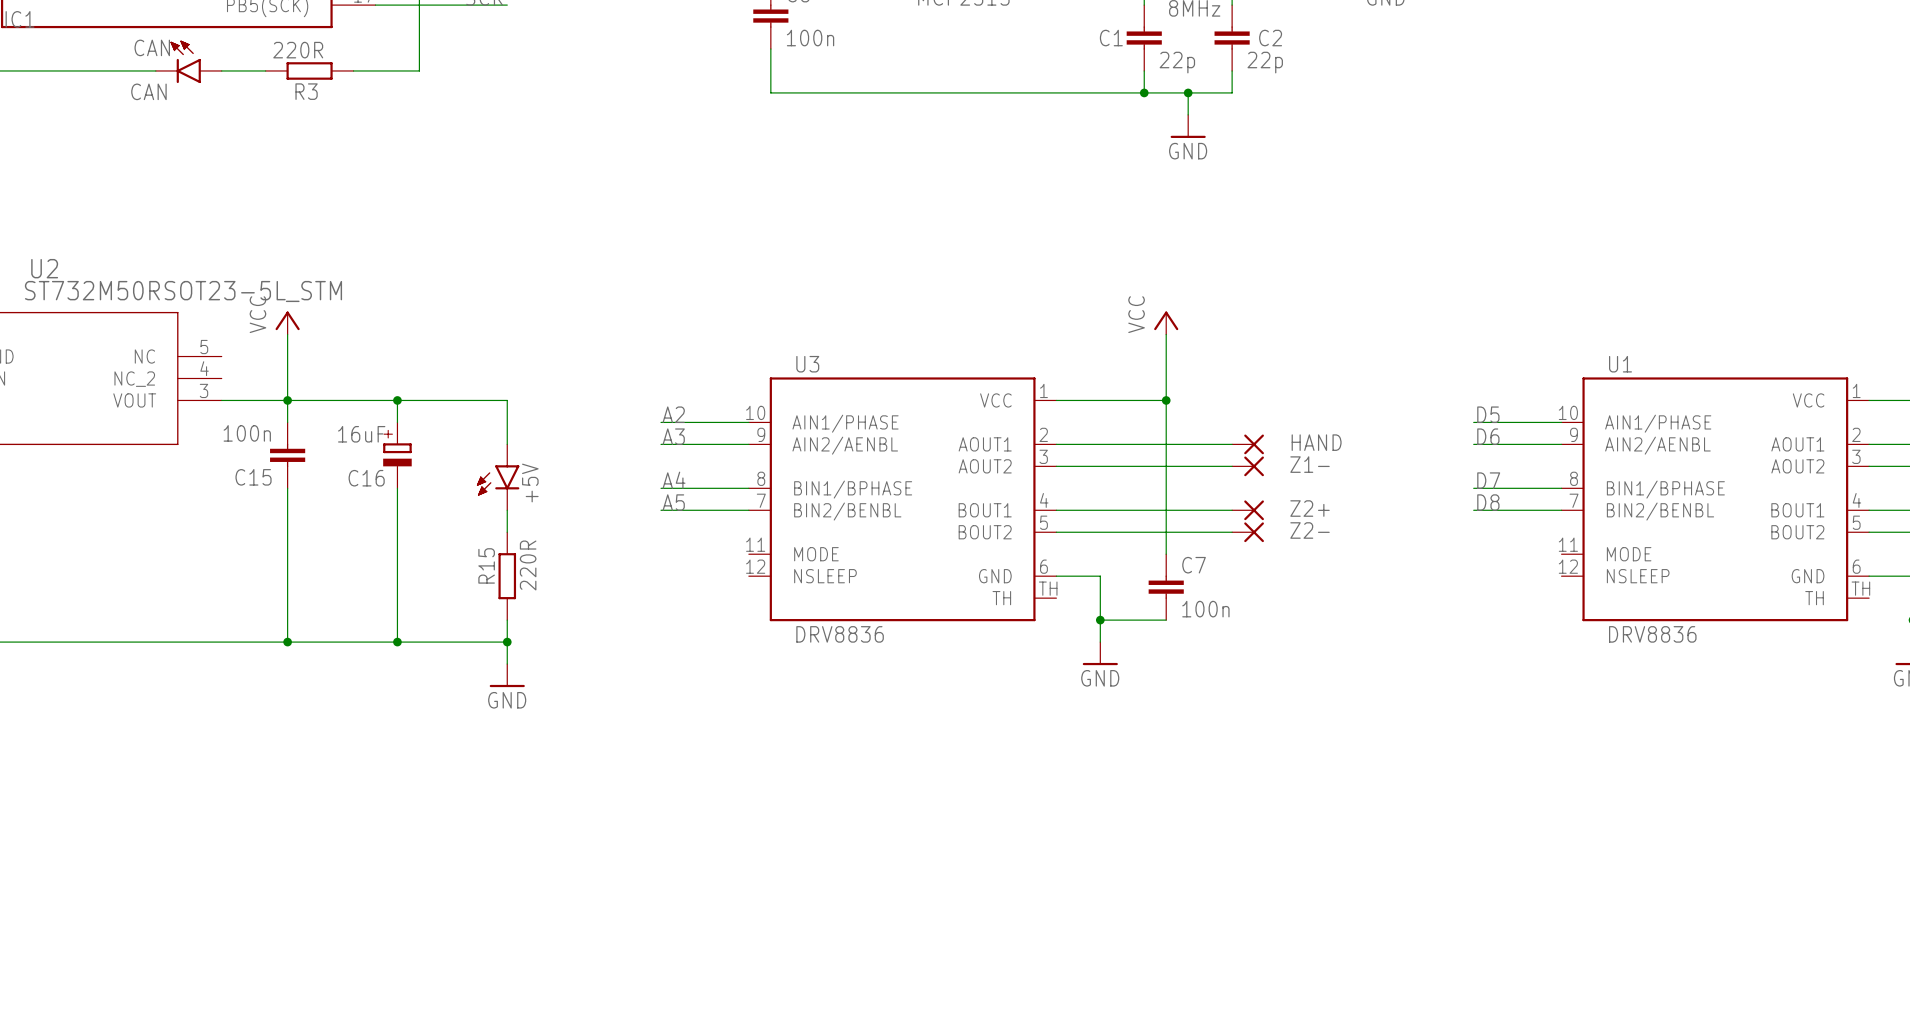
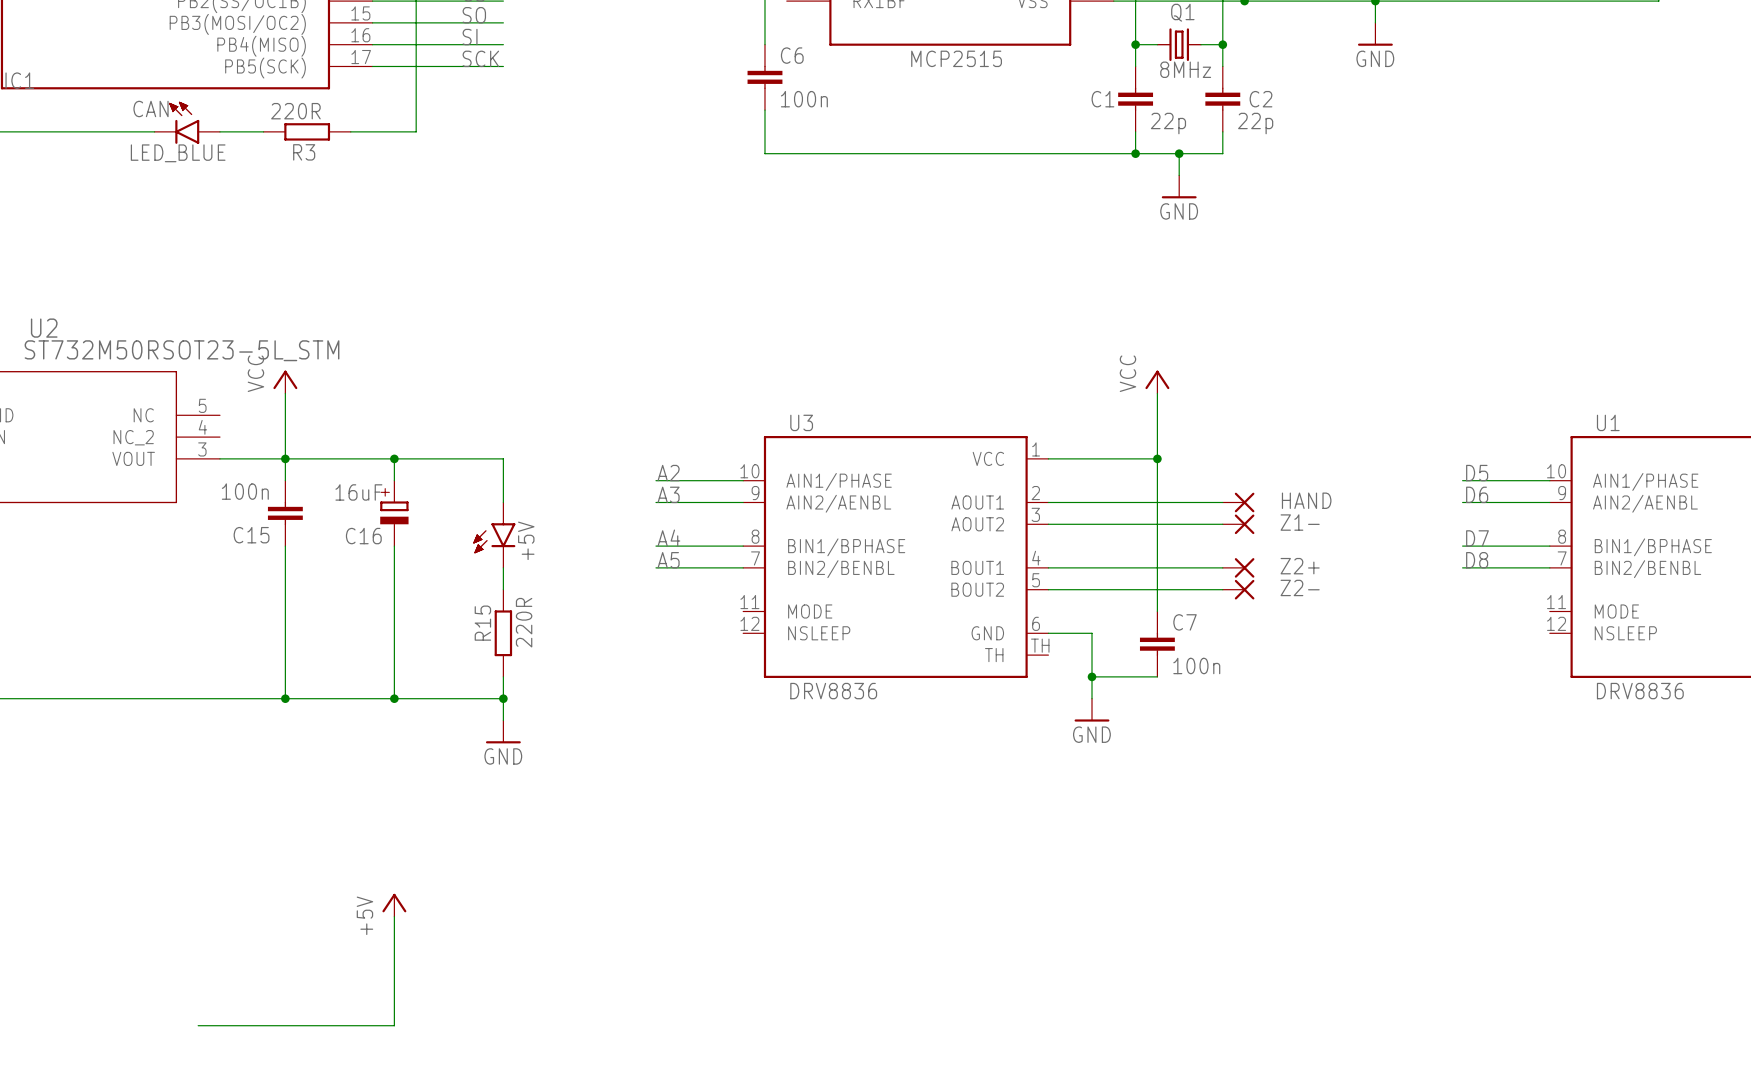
CAN value: CAN (148, 91) -> LED_BLUE (178, 153)
power symbol: none -> +5V (394, 905)
wire: none -> (394, 916) (394, 1025) (198, 1025)

